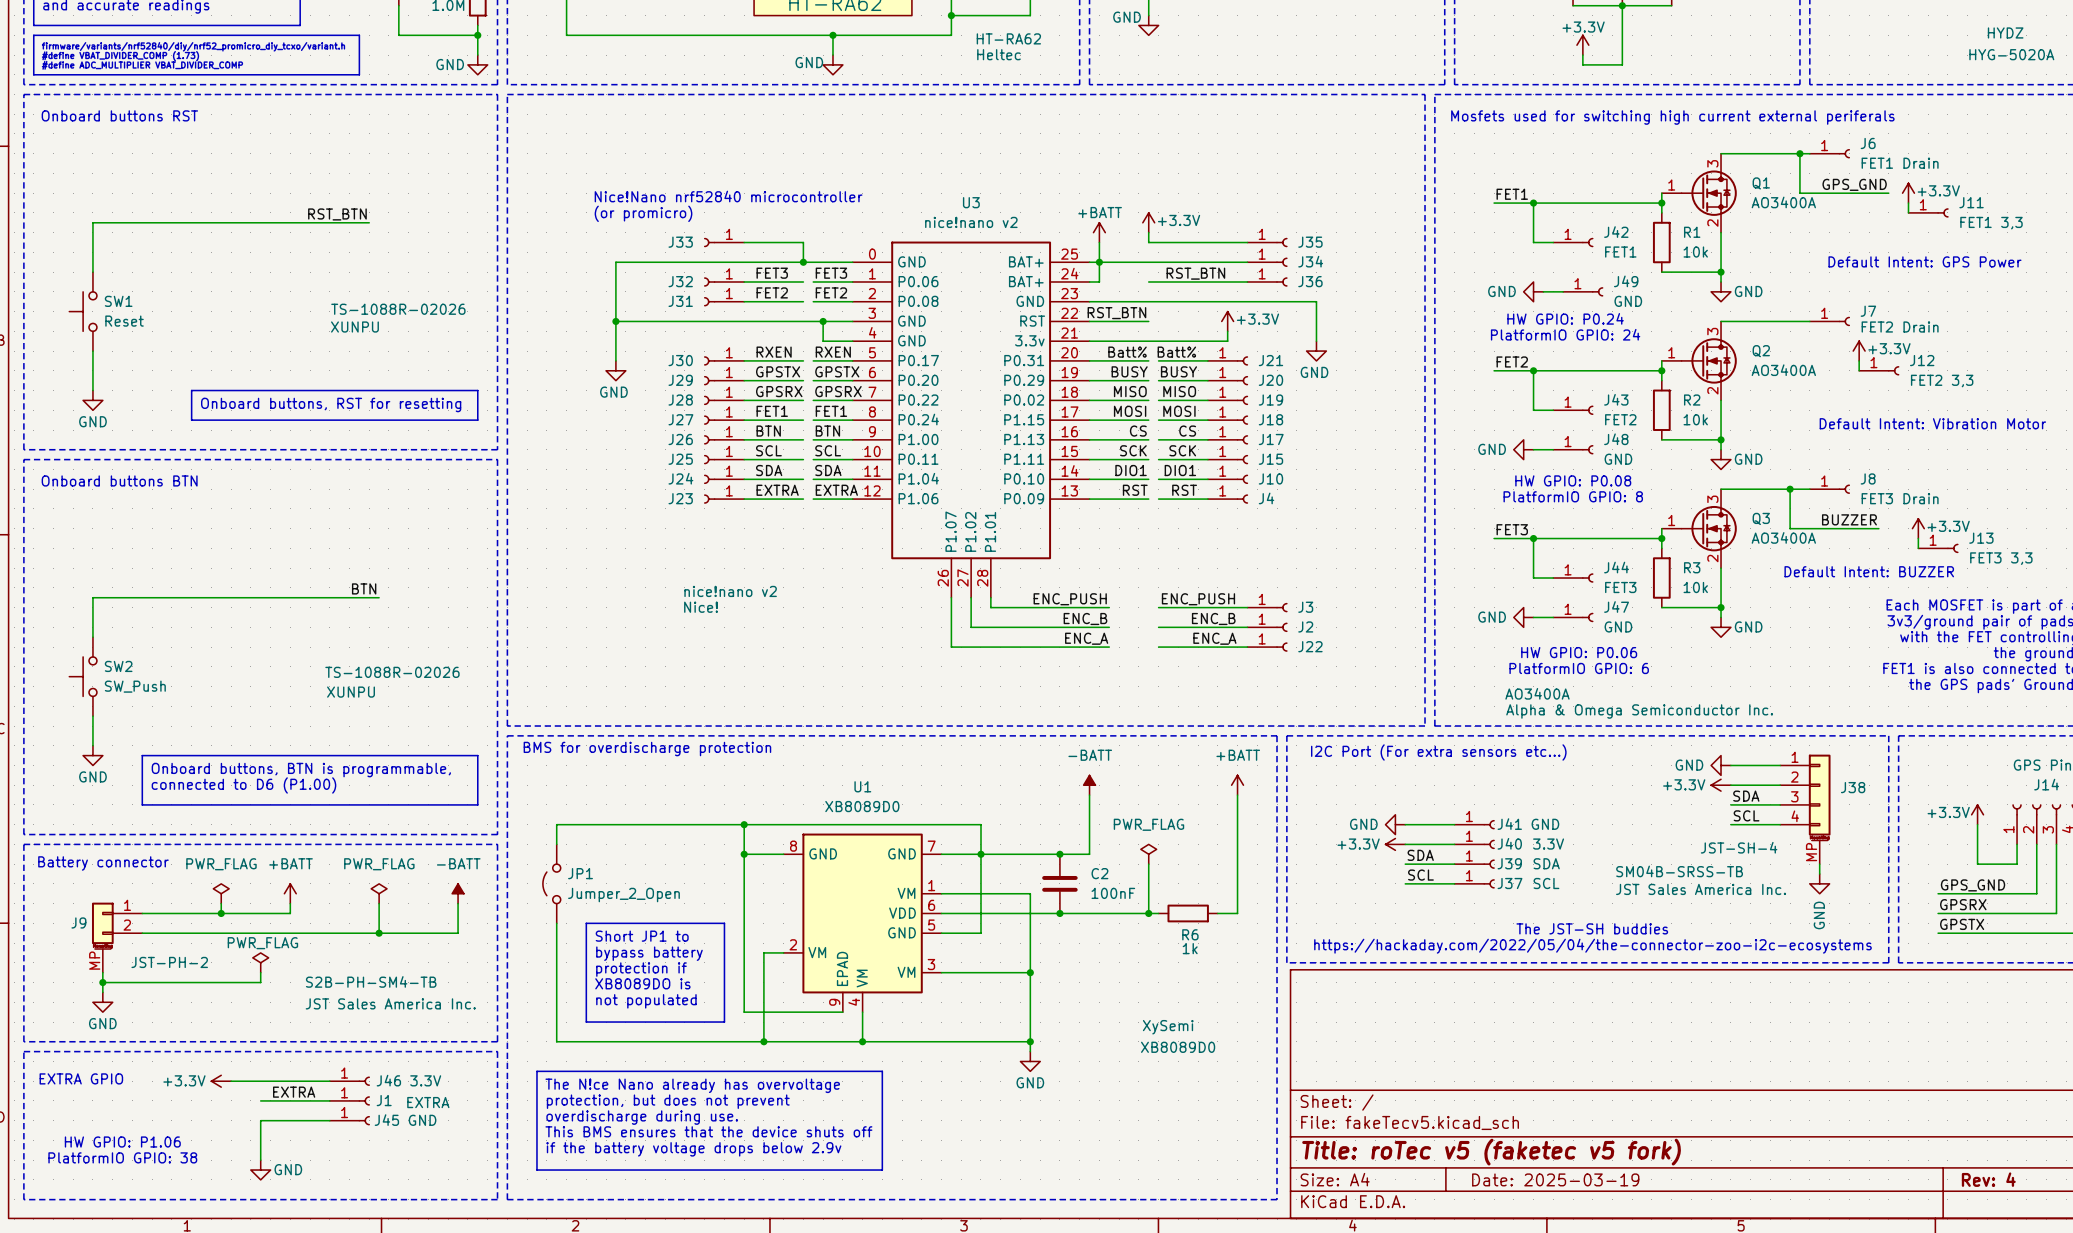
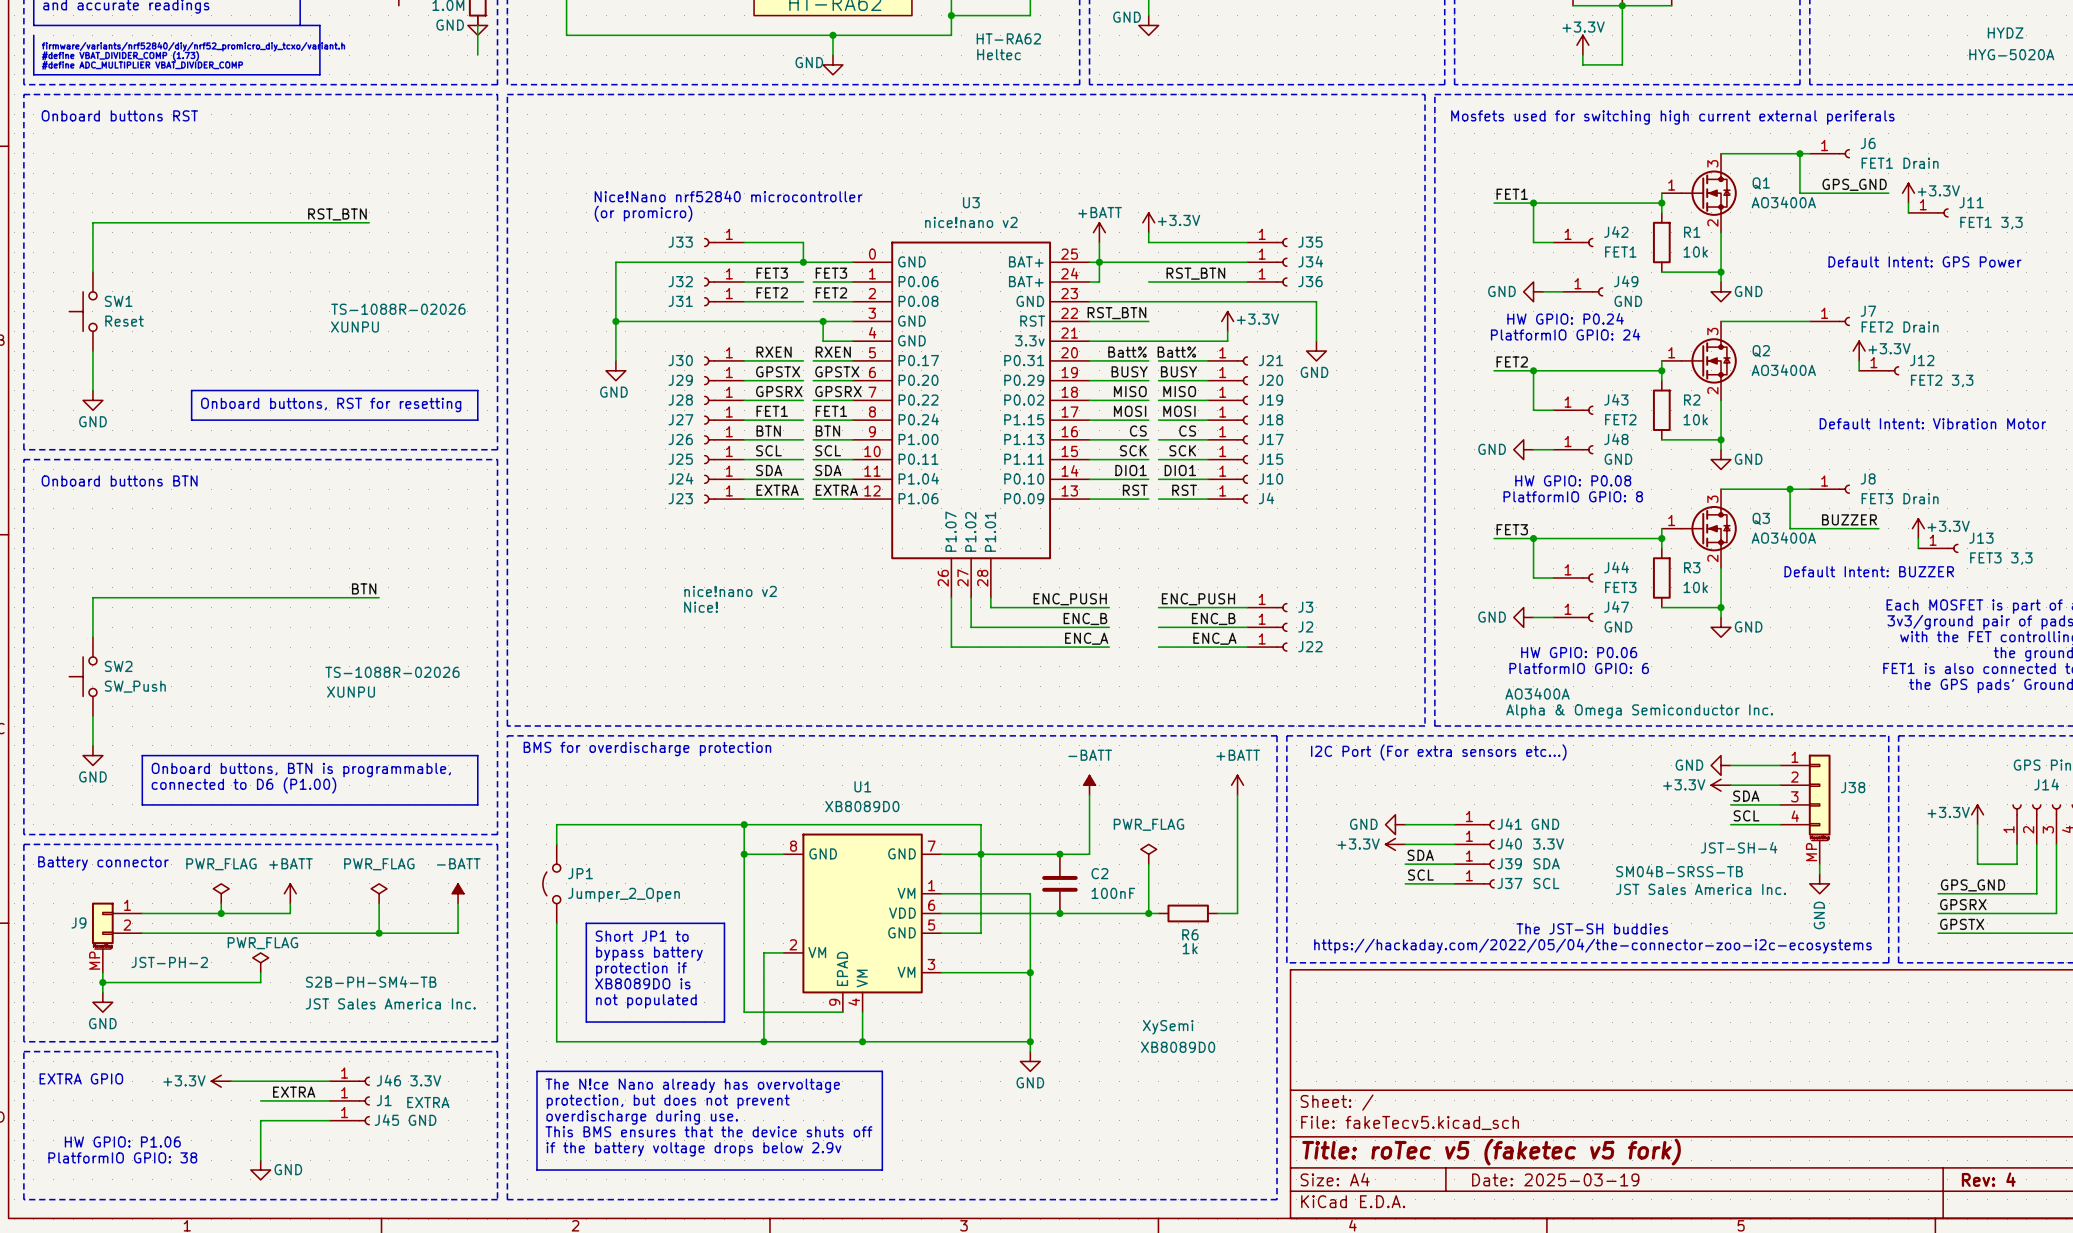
wire: (398, 5) (398, 35) (477, 35) -> none
line: (33, 35) (359, 35) (359, 74) (319, 74) -> (300, 25) (319, 25) (319, 74)
junction: (477, 35) -> none
power symbol position: GND (477, 64) -> GND (477, 25)

